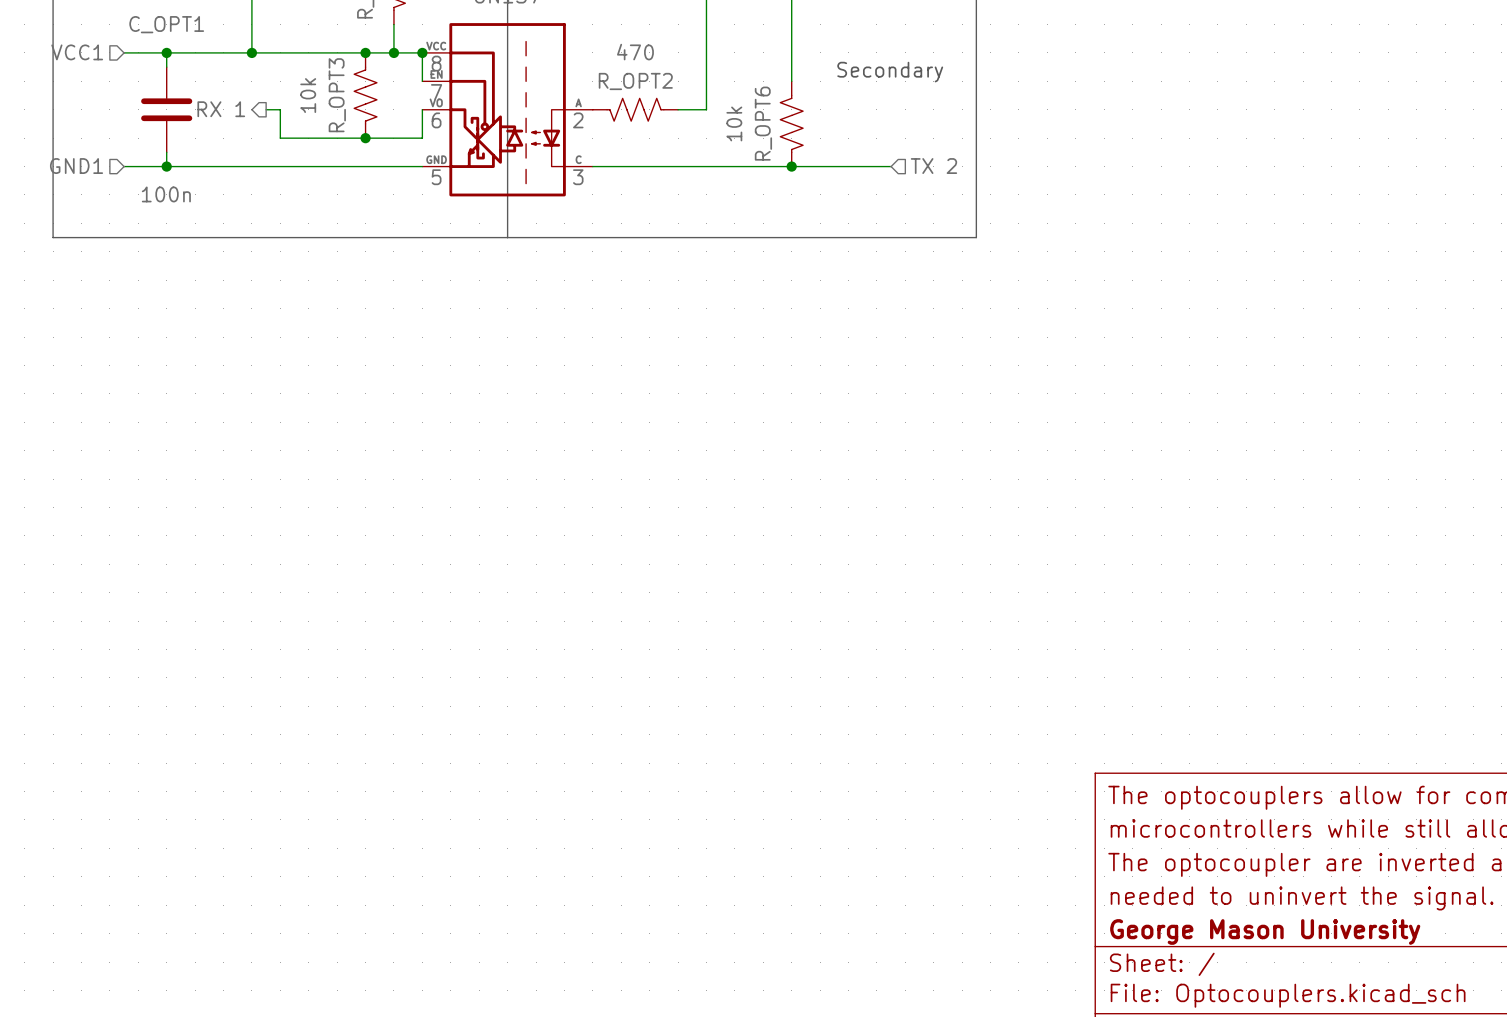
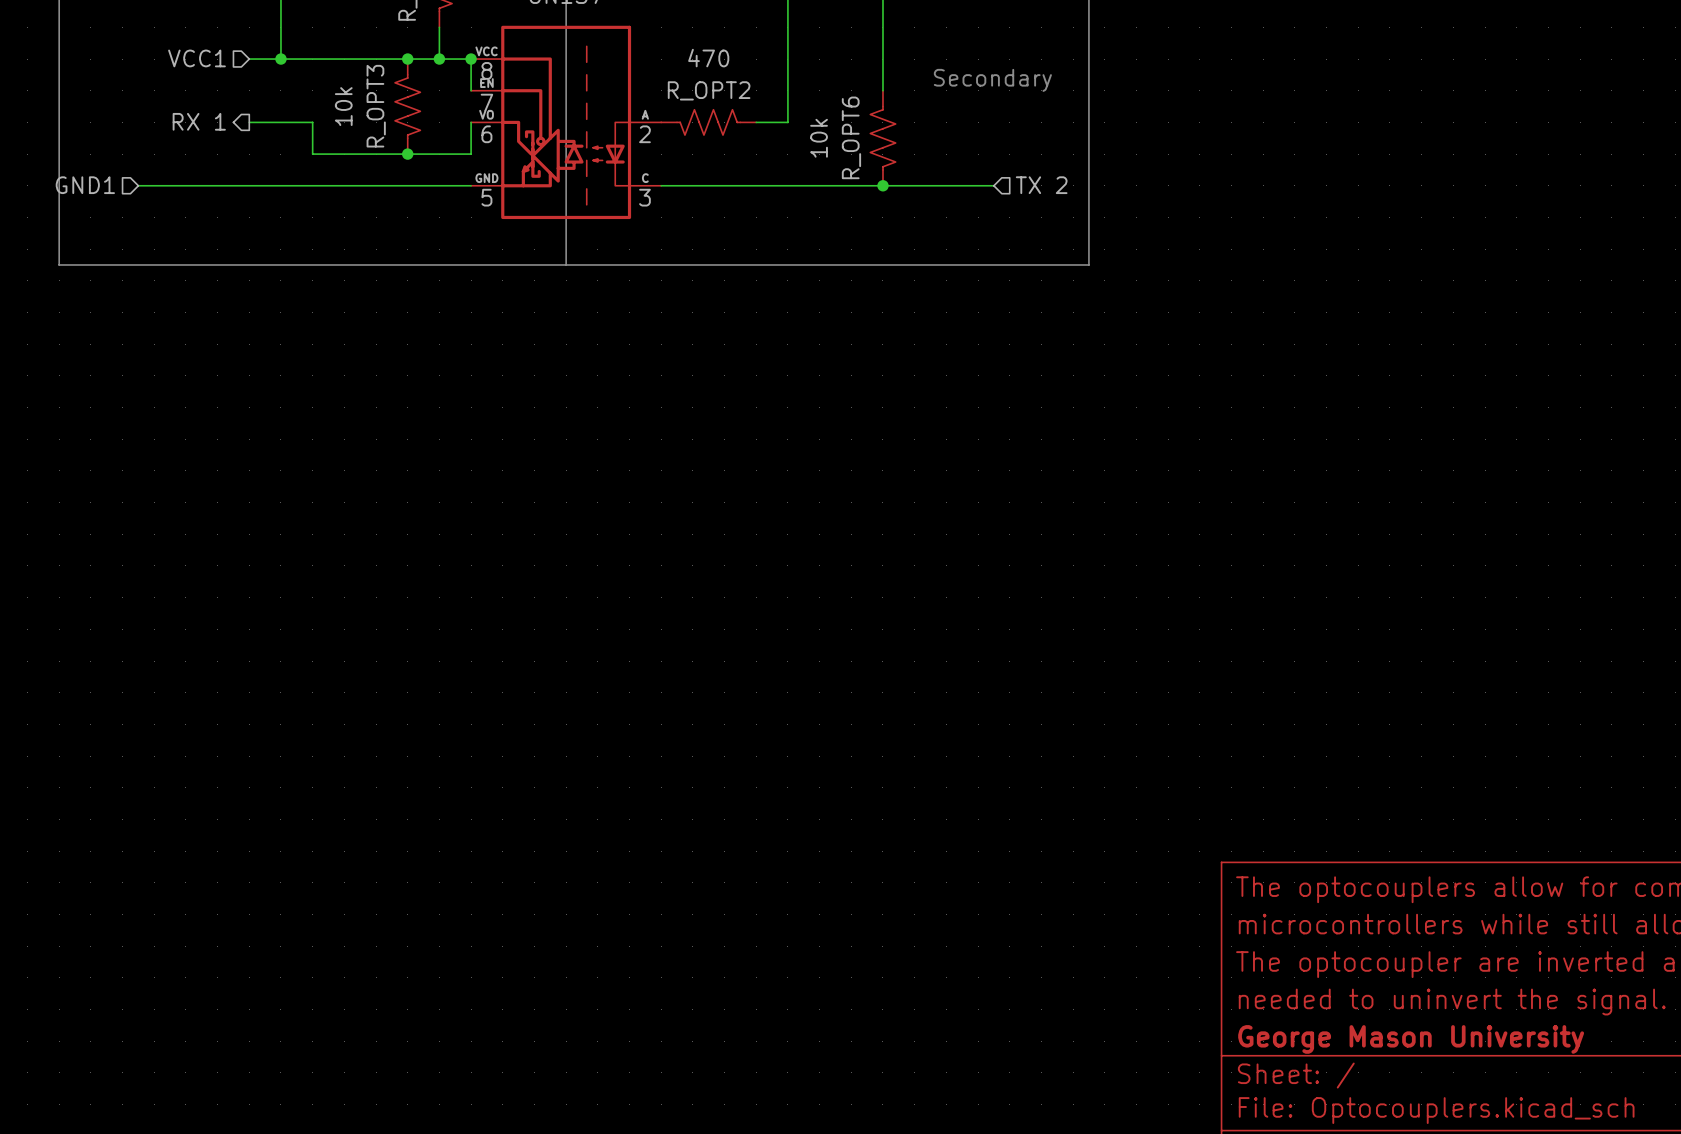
hierarchical label position: VCC1 (77, 52) -> VCC1 (196, 58)
wire: (124, 52) (223, 52) -> none
wire: (166, 52) (166, 67) -> none
junction: (166, 52) -> none
C_OPT1: 100n (166, 109) -> none
hierarchical label position: RX 1 (221, 109) -> RX 1 (199, 121)
wire: none -> (249, 122) (296, 122)
wire: (166, 152) (166, 166) -> none
junction: (166, 166) -> none

